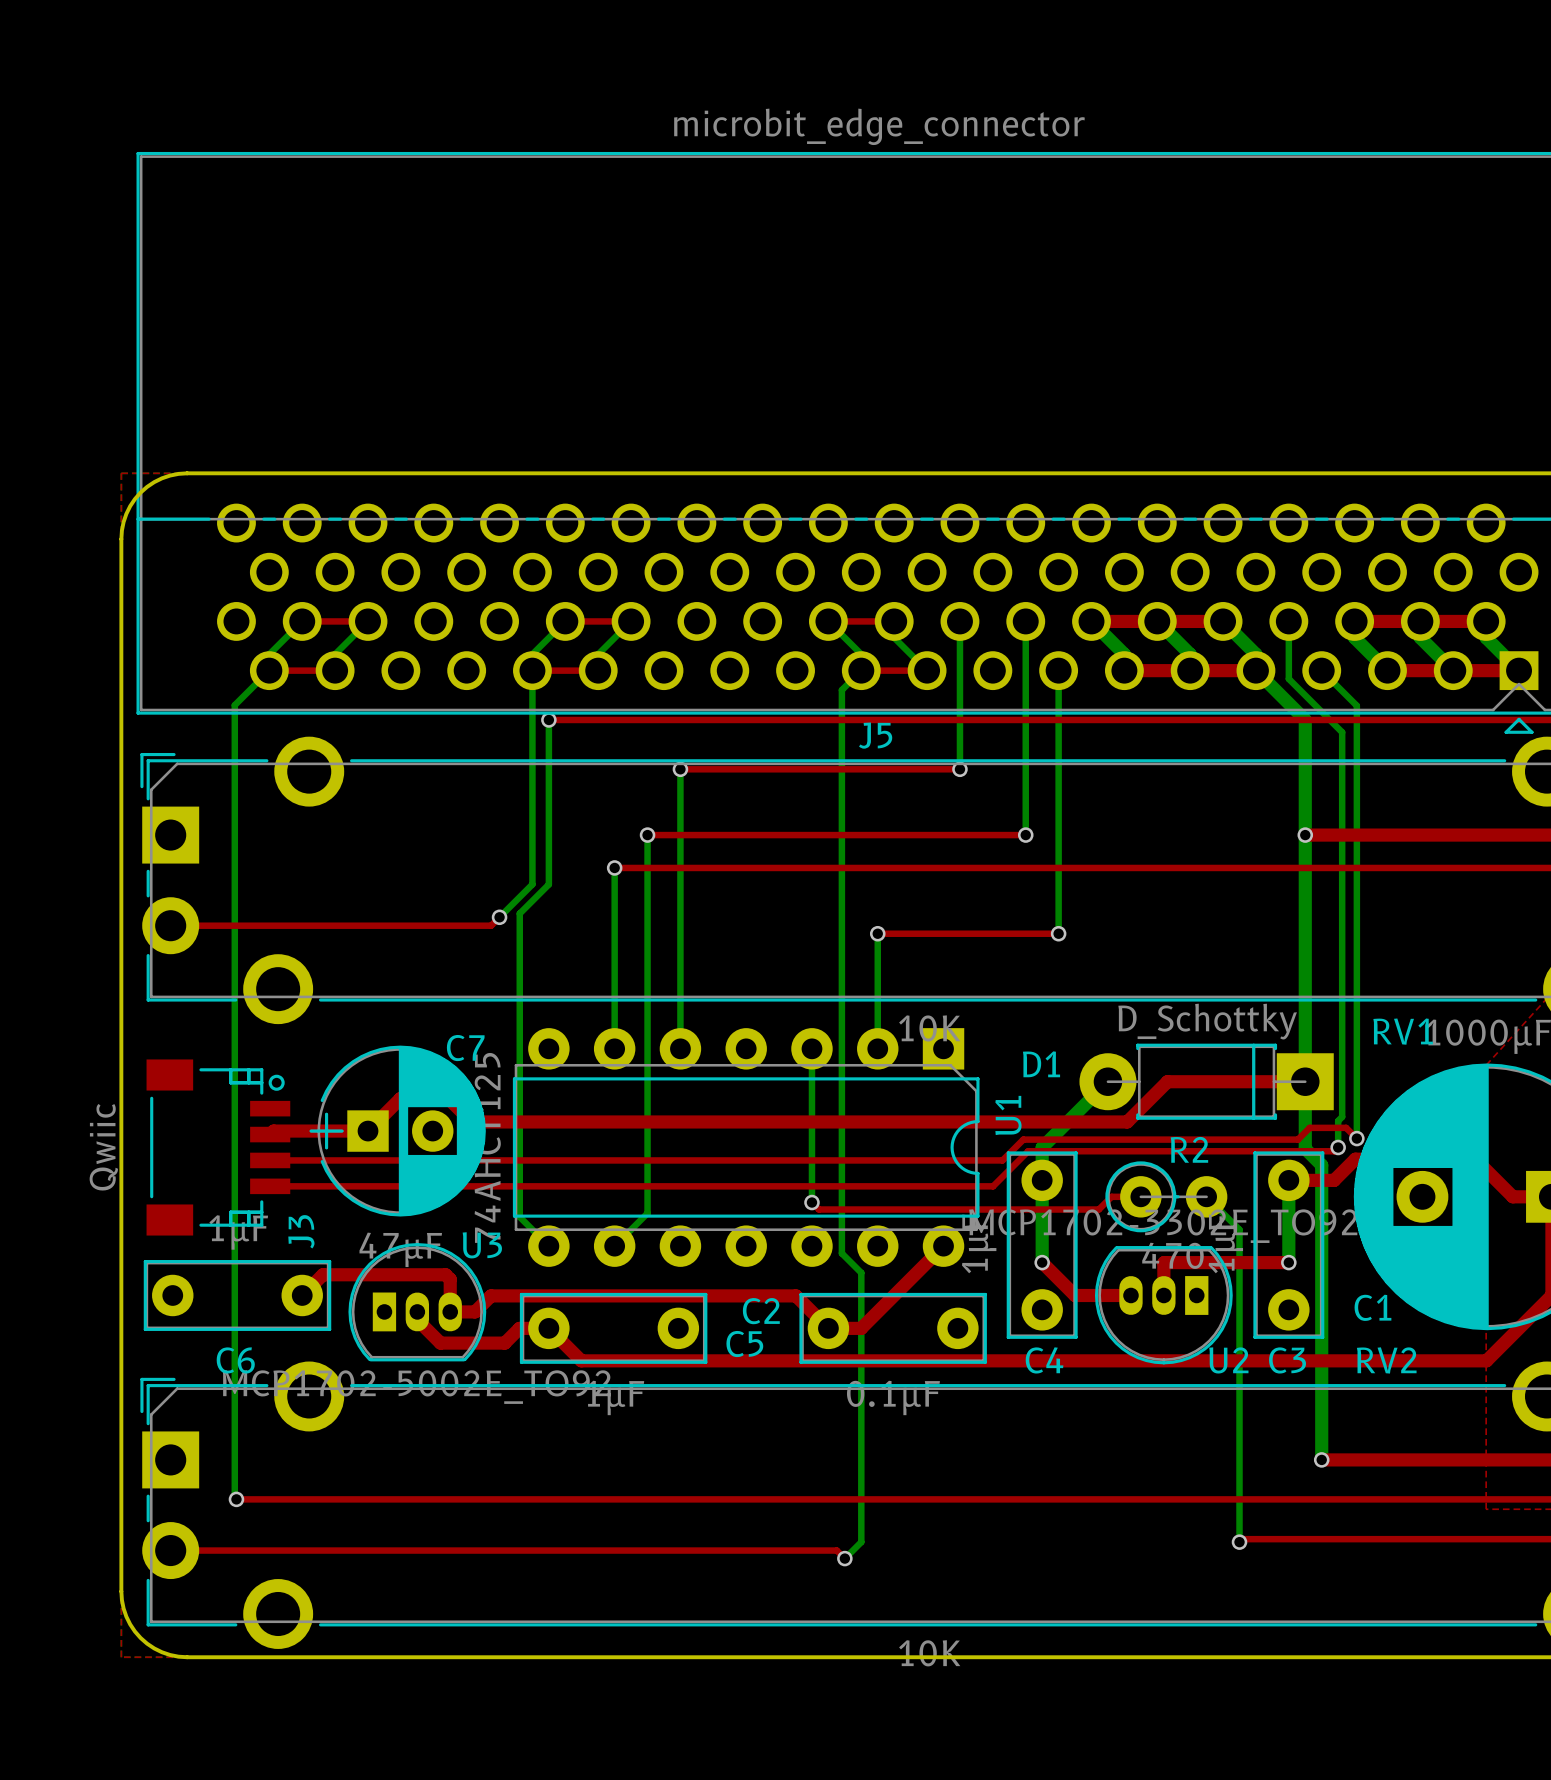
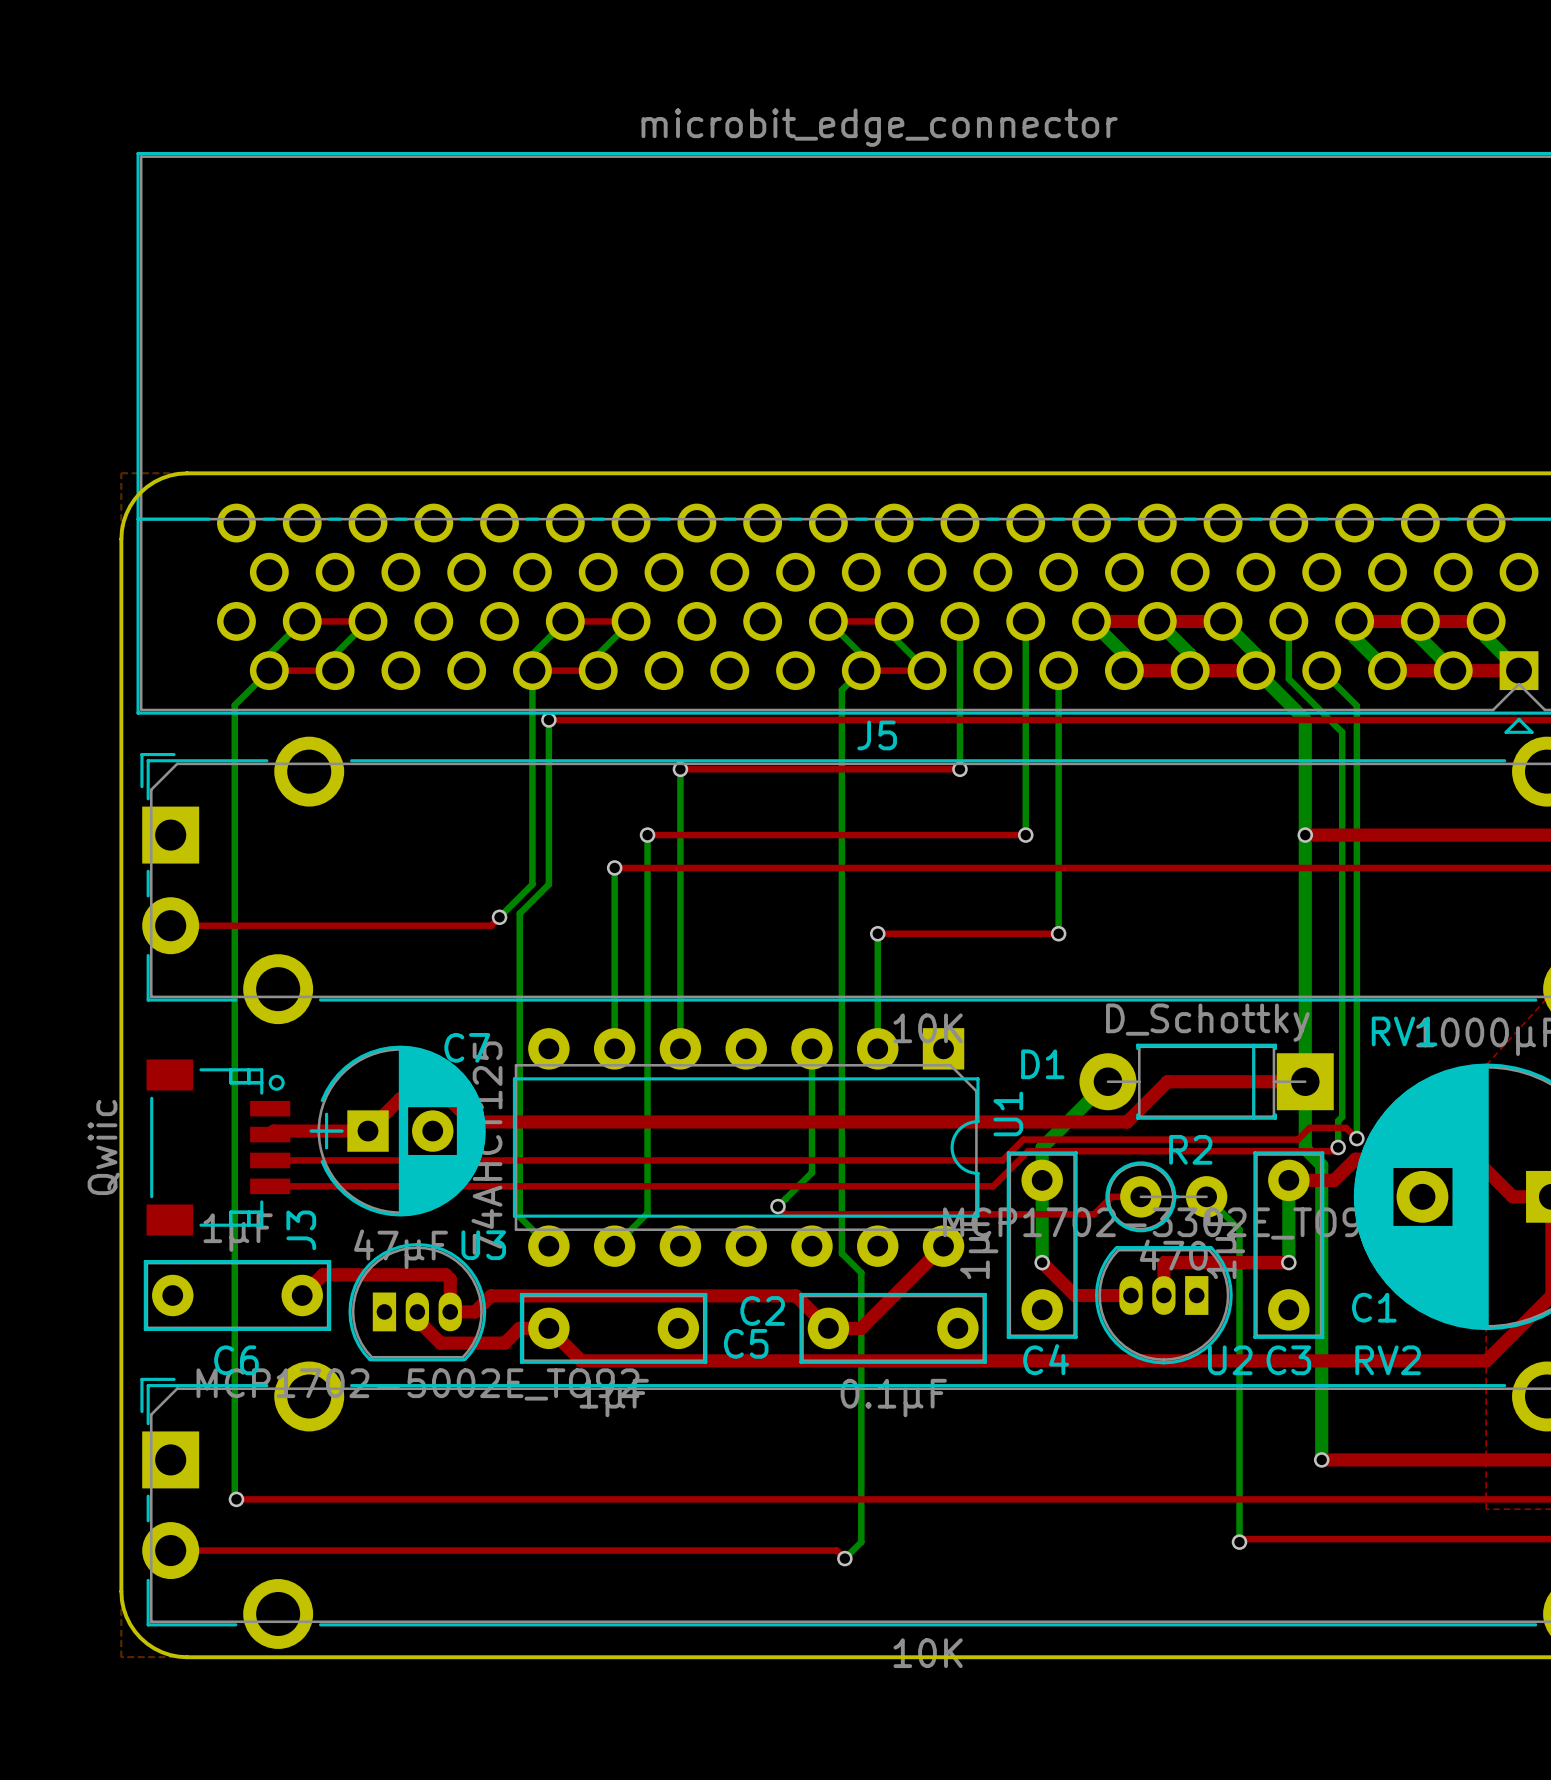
bottom track: (811, 1172) (811, 1202) -> (811, 1172) (778, 1206)
top track: (811, 1202) (818, 1209) (1098, 1209) -> (778, 1206) (785, 1214) (1094, 1214) (1098, 1209)
via position: (811, 1202) -> (778, 1206)

